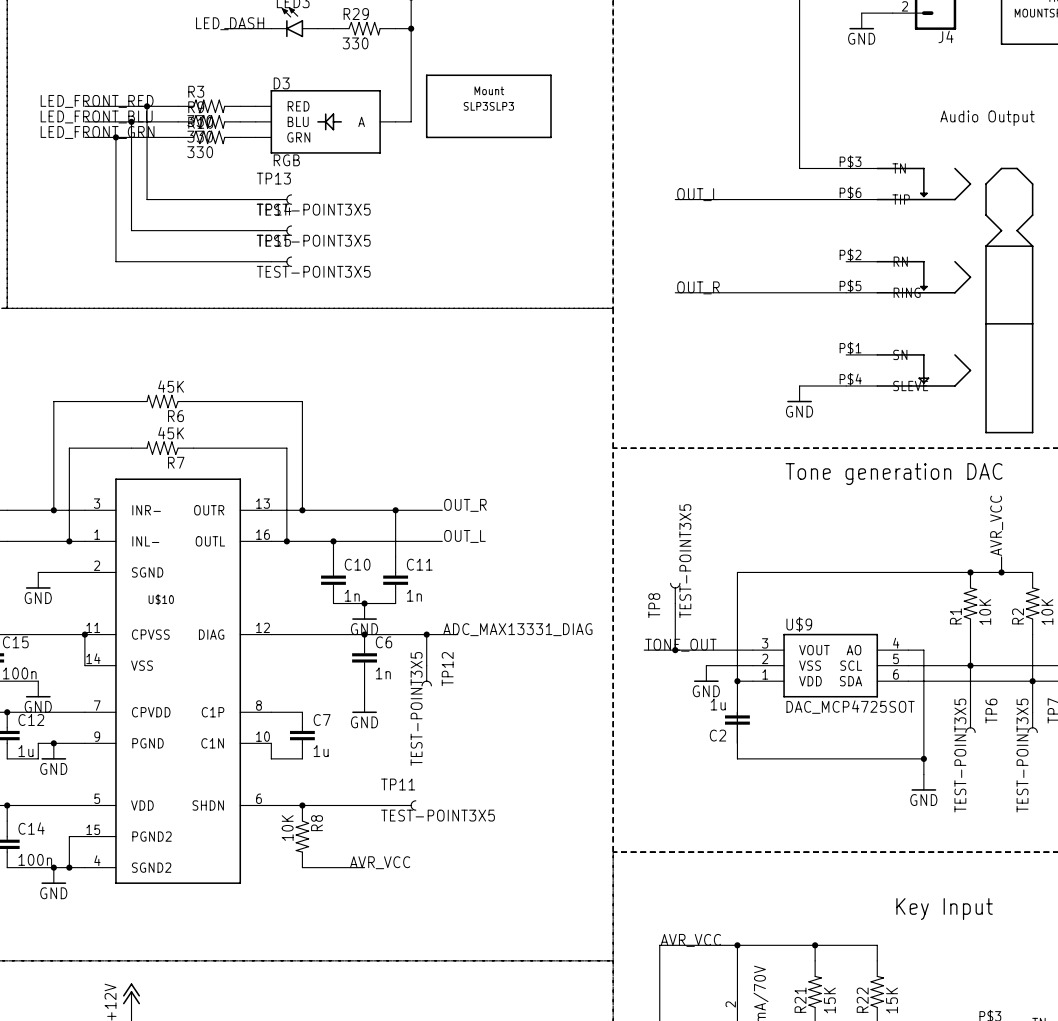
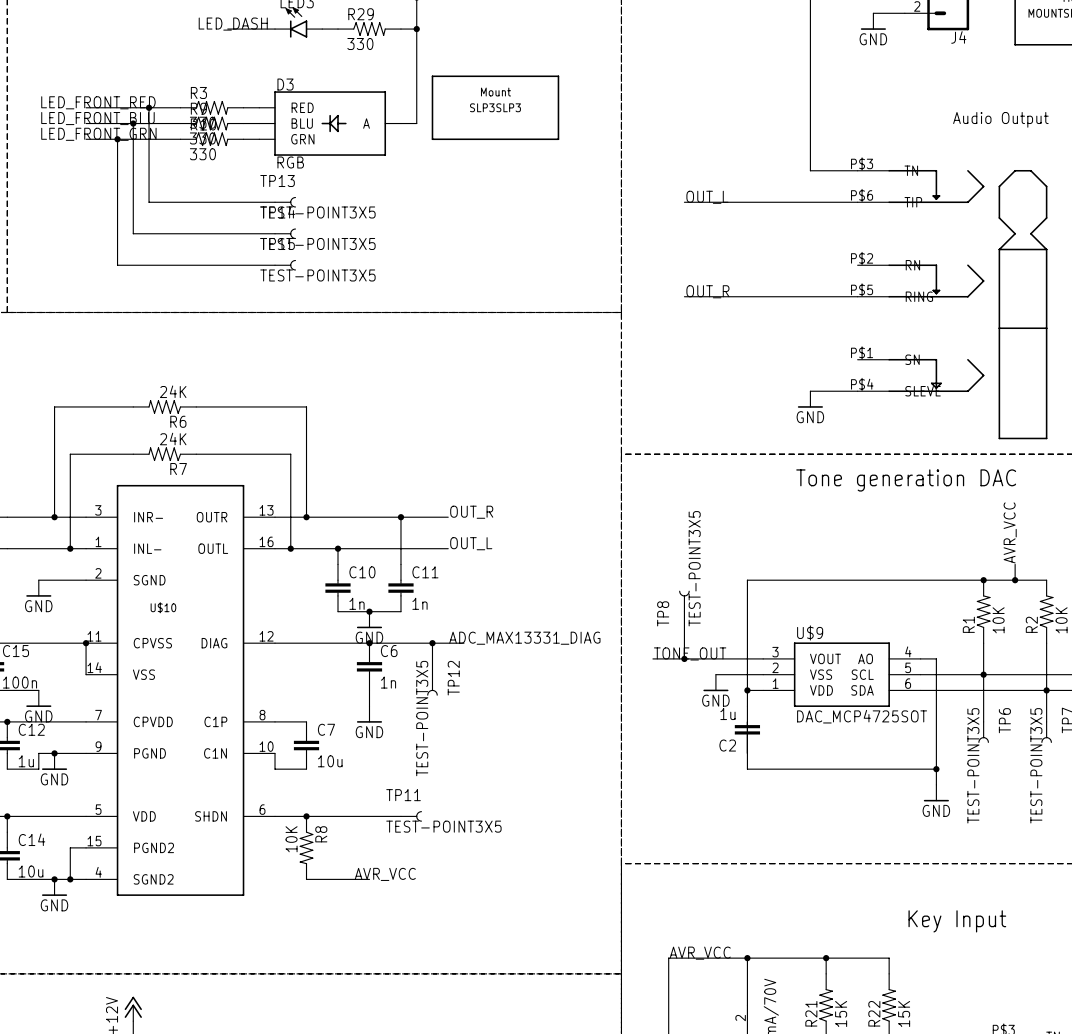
R6 value: 45K (171, 386) -> 24K (173, 391)
R7 value: 45K (171, 433) -> 24K (173, 438)
C7 value: 1u (321, 751) -> 10u (330, 761)
C14 value: 100n (35, 859) -> 10u (31, 871)

